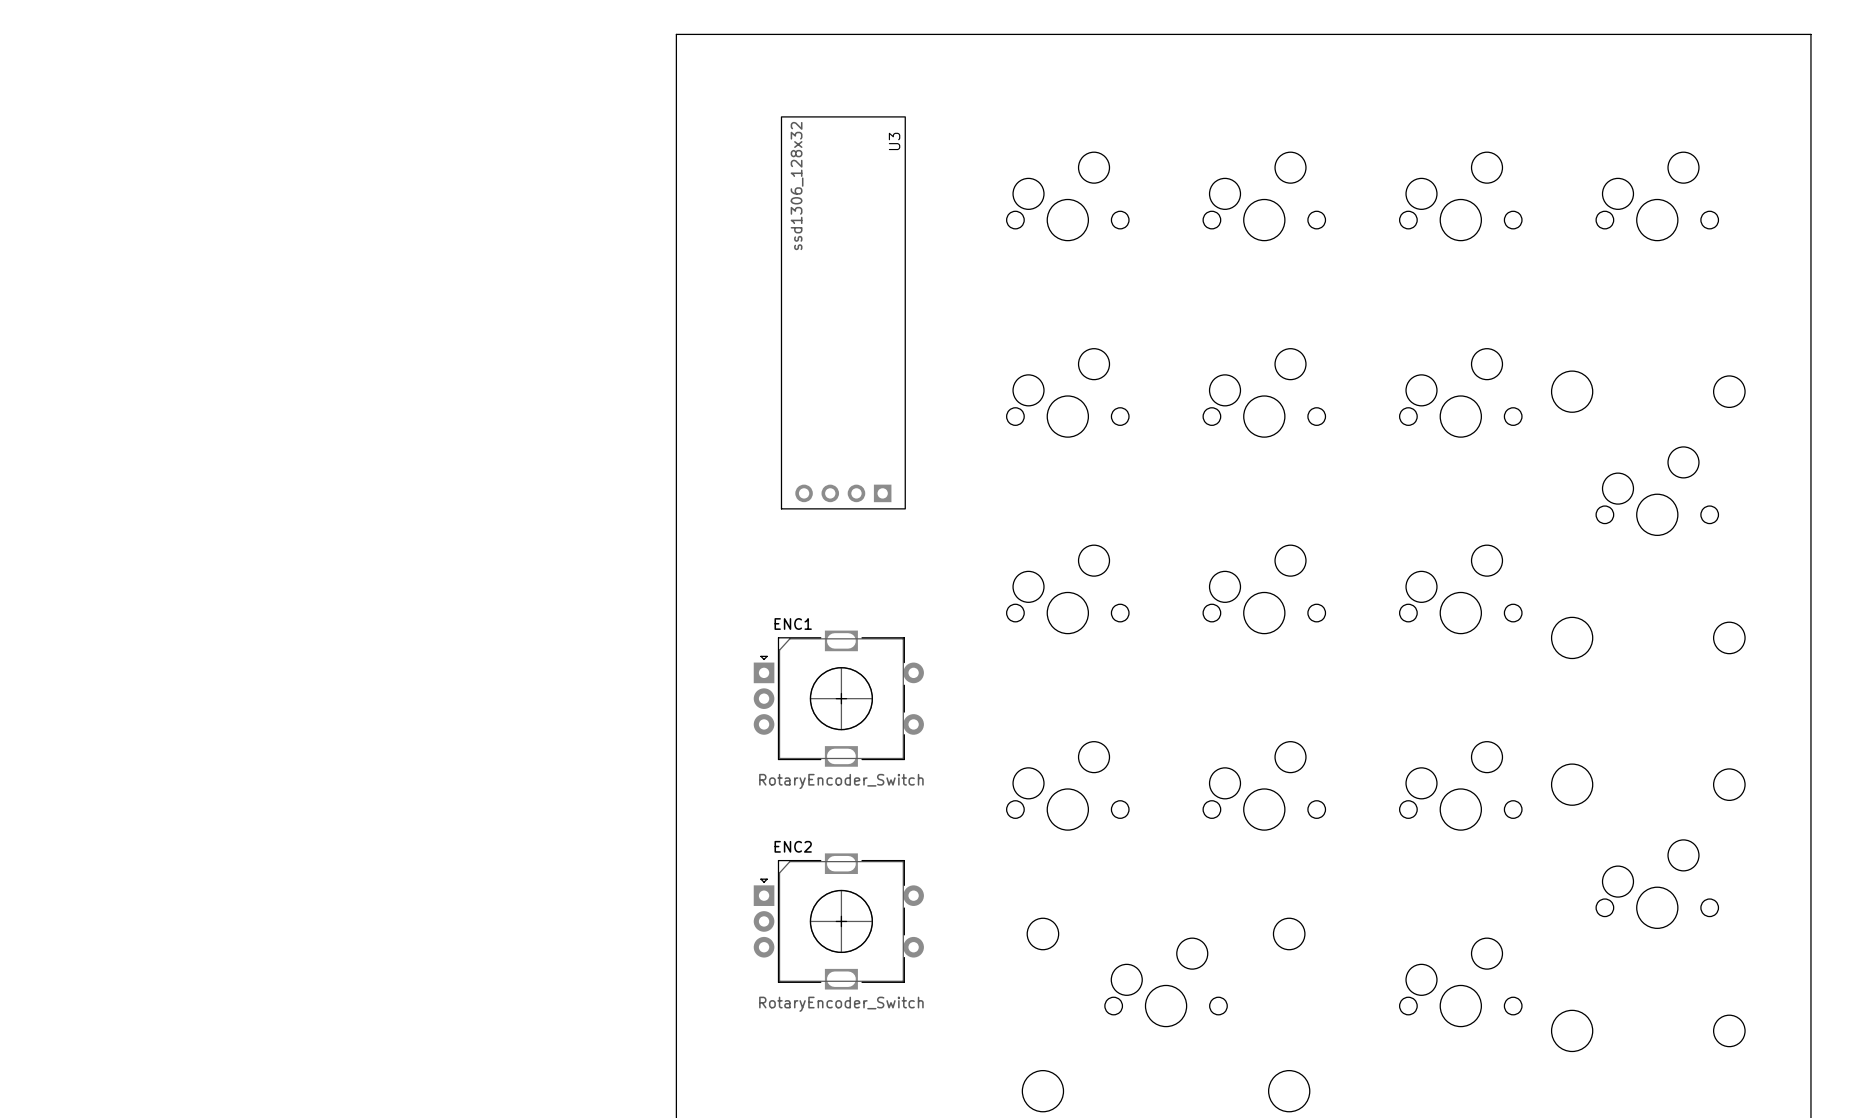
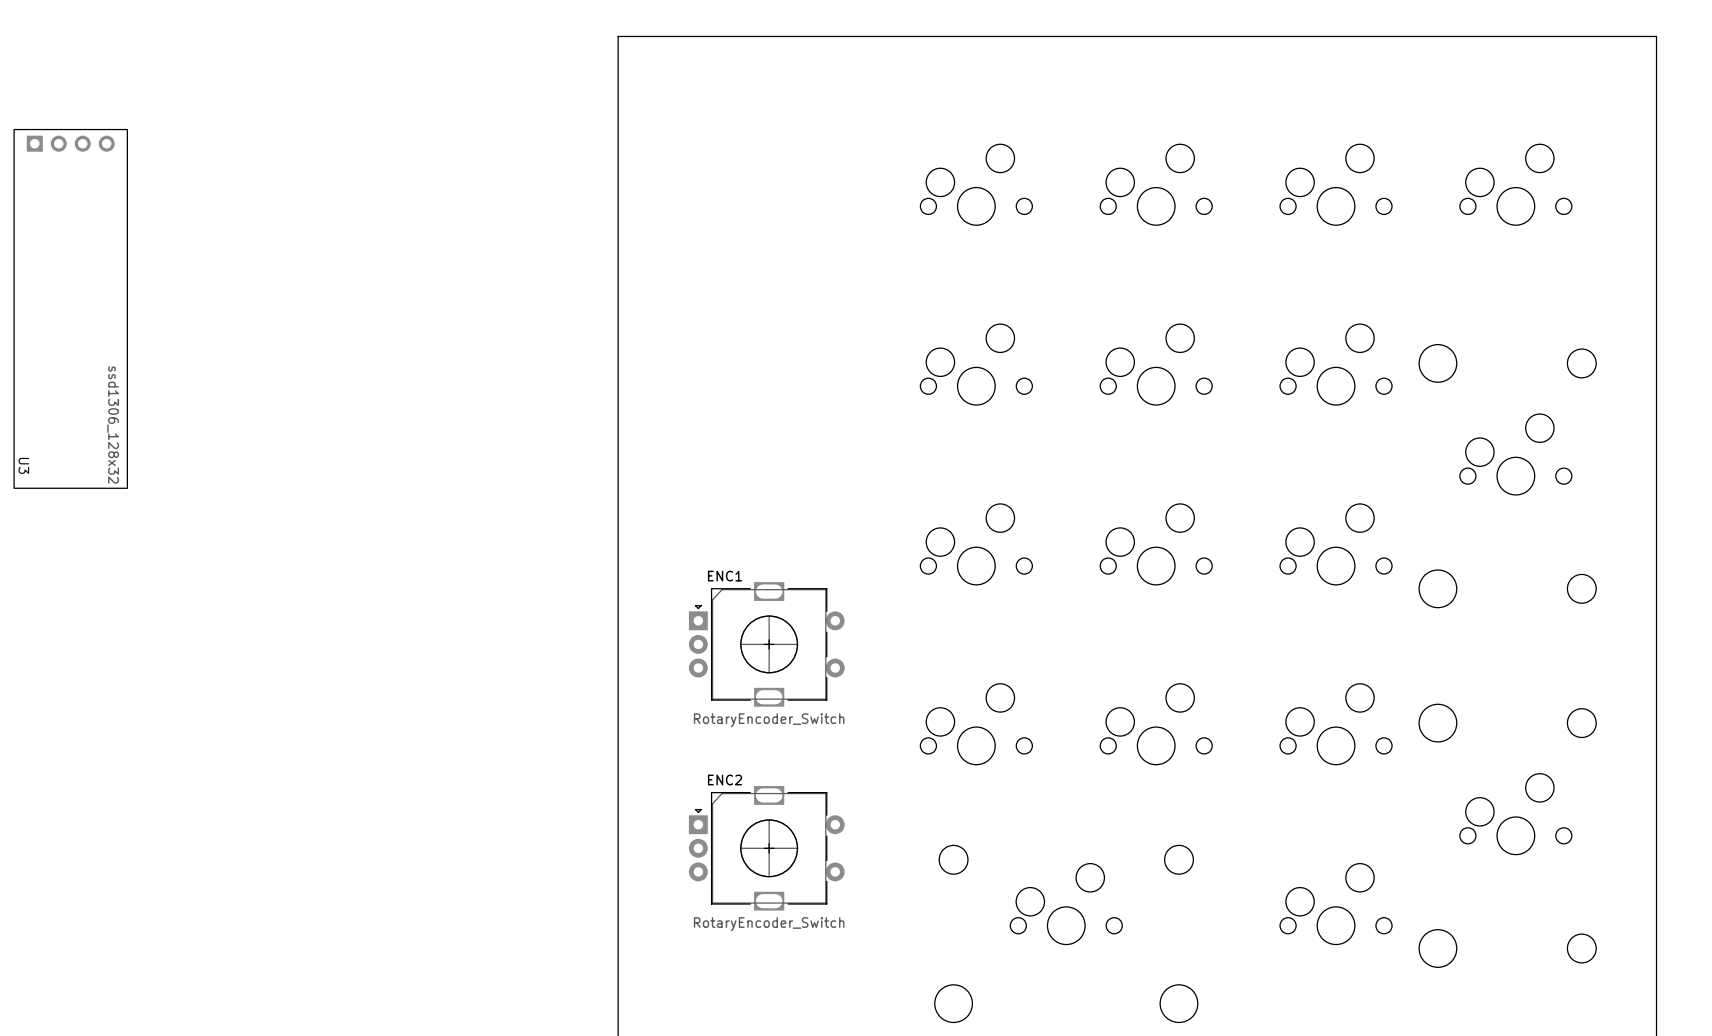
U3 rotation: 0° (843, 312) -> 180° (70, 308)
U3 position: (843, 312) -> (70, 308)

